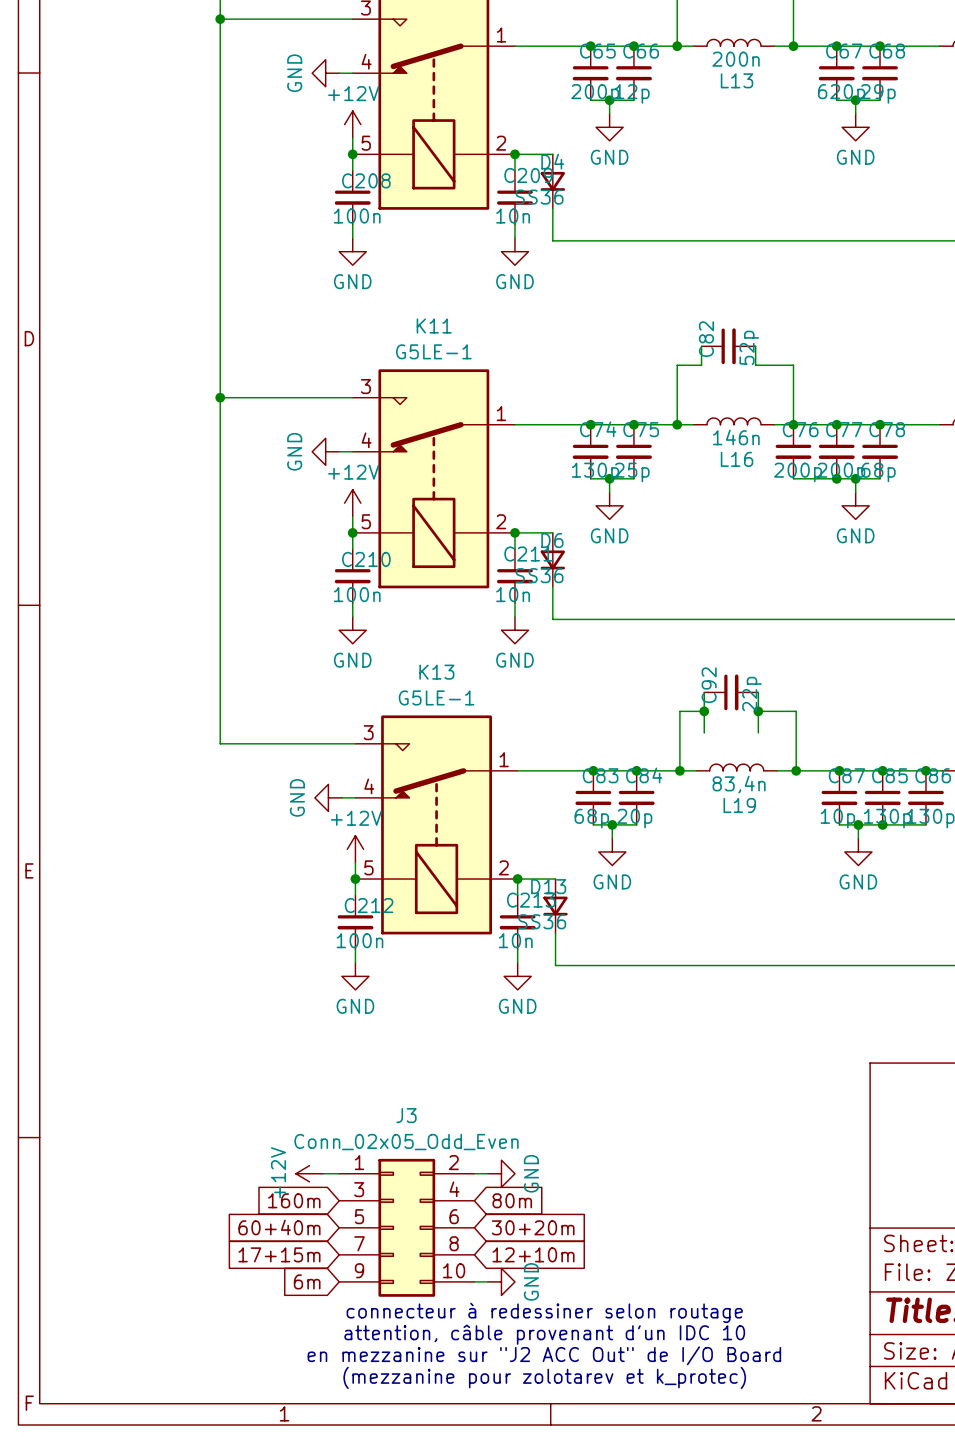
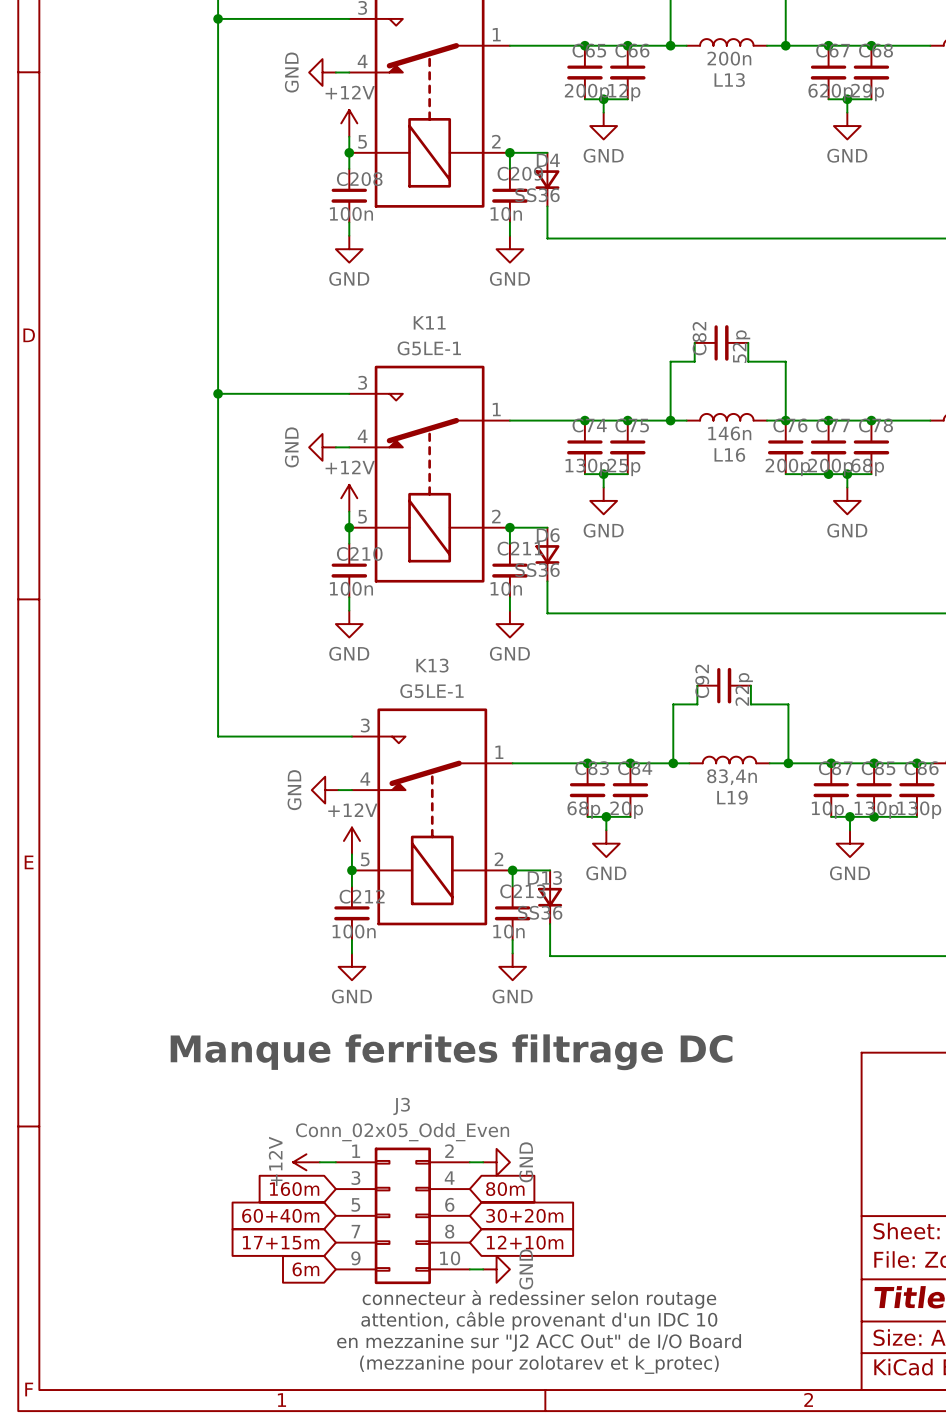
wire: (704, 711) (704, 732) -> none
junction: (704, 711) -> none
wire: (758, 711) (758, 732) -> none
junction: (758, 711) -> none
text: none -> Manque ferrites filtrage DC (451, 1052)

